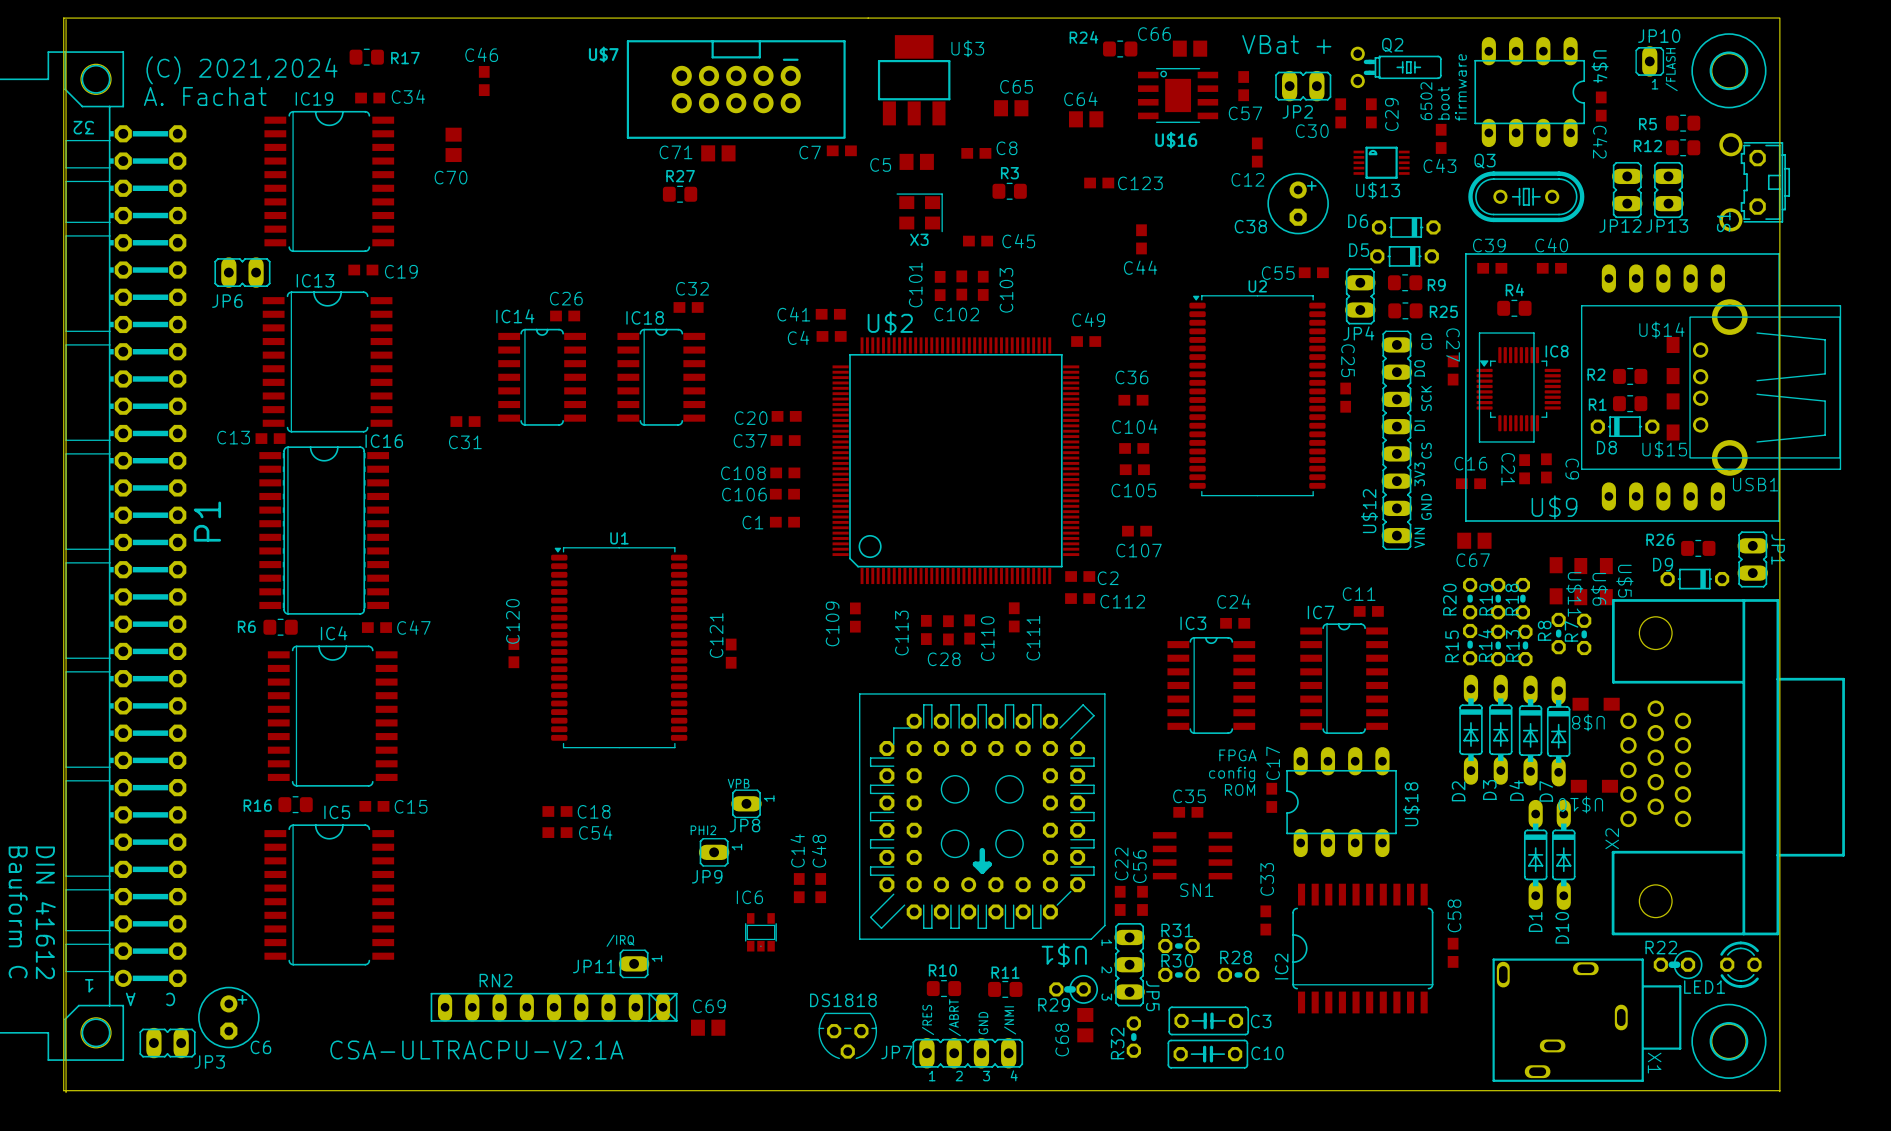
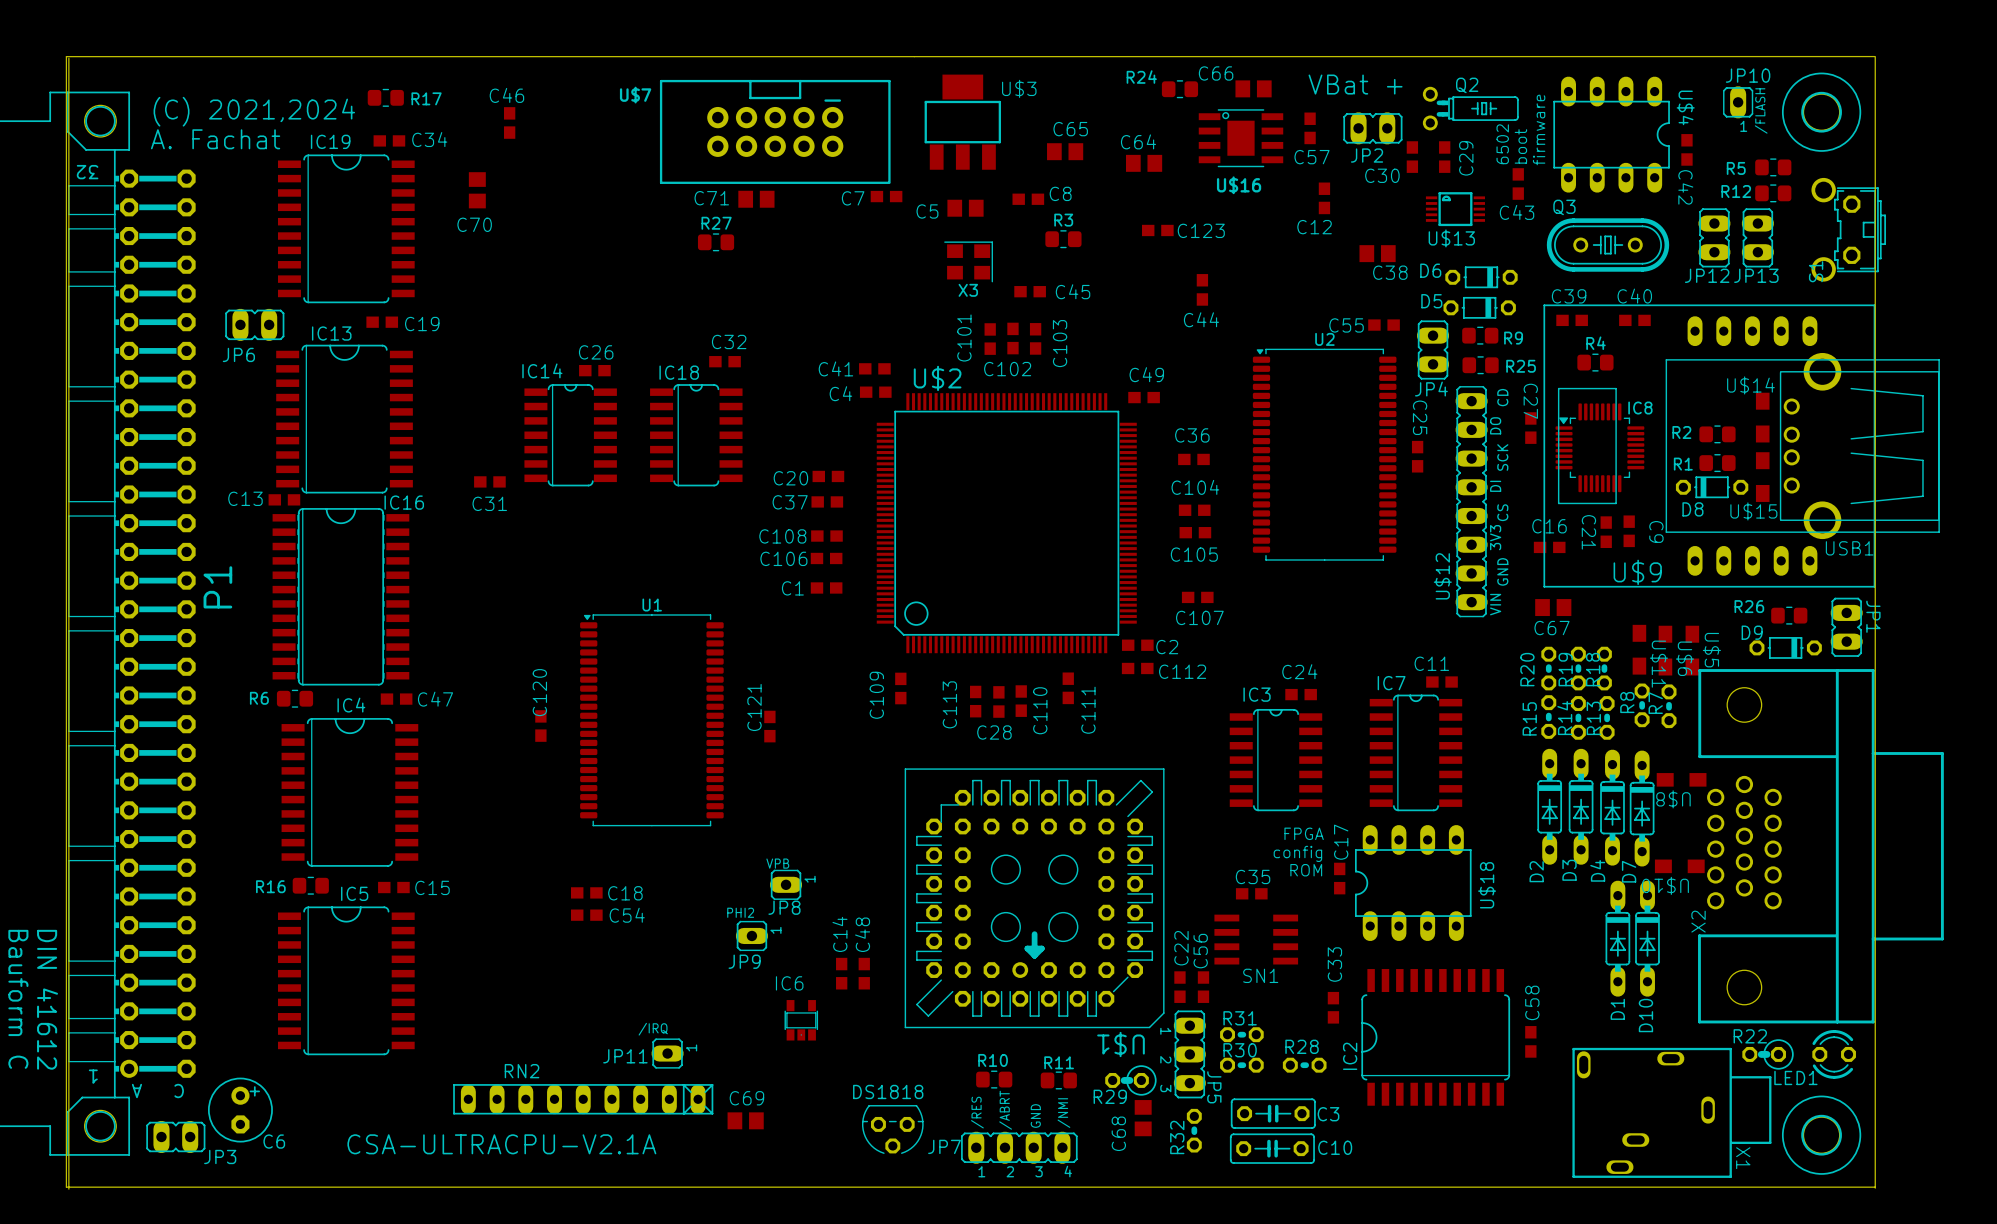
C38 footprint: [1267, 172, 1329, 235] -> [1359, 245, 1396, 263]
C38 name position: C38 (1250, 226) -> C38 (1390, 272)

